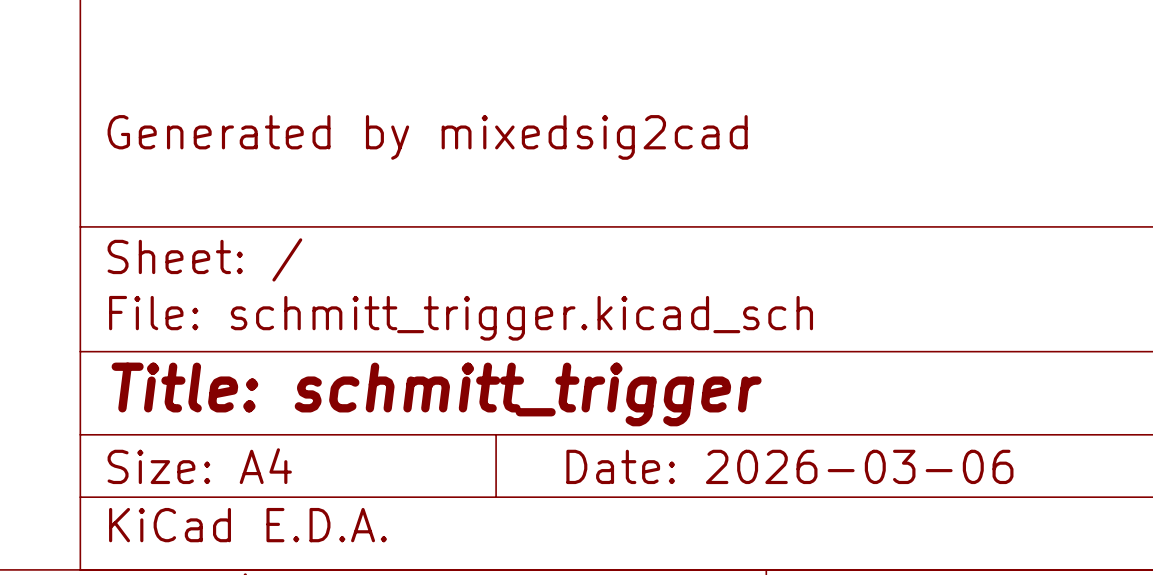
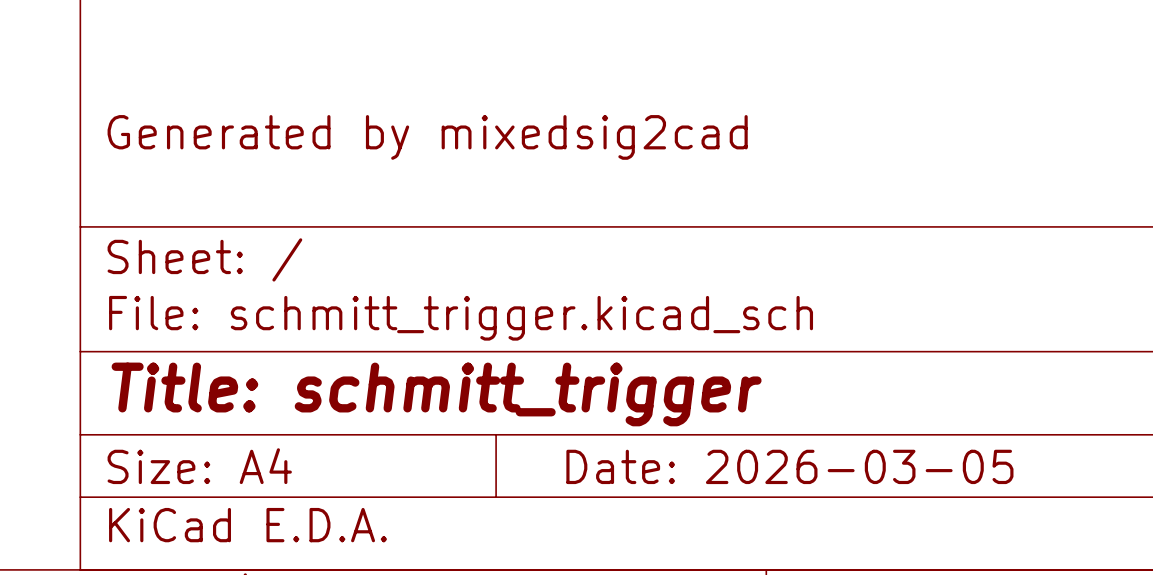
title block: Date: 2026-03-06 (789, 466) -> Date: 2026-03-05 (789, 466)

